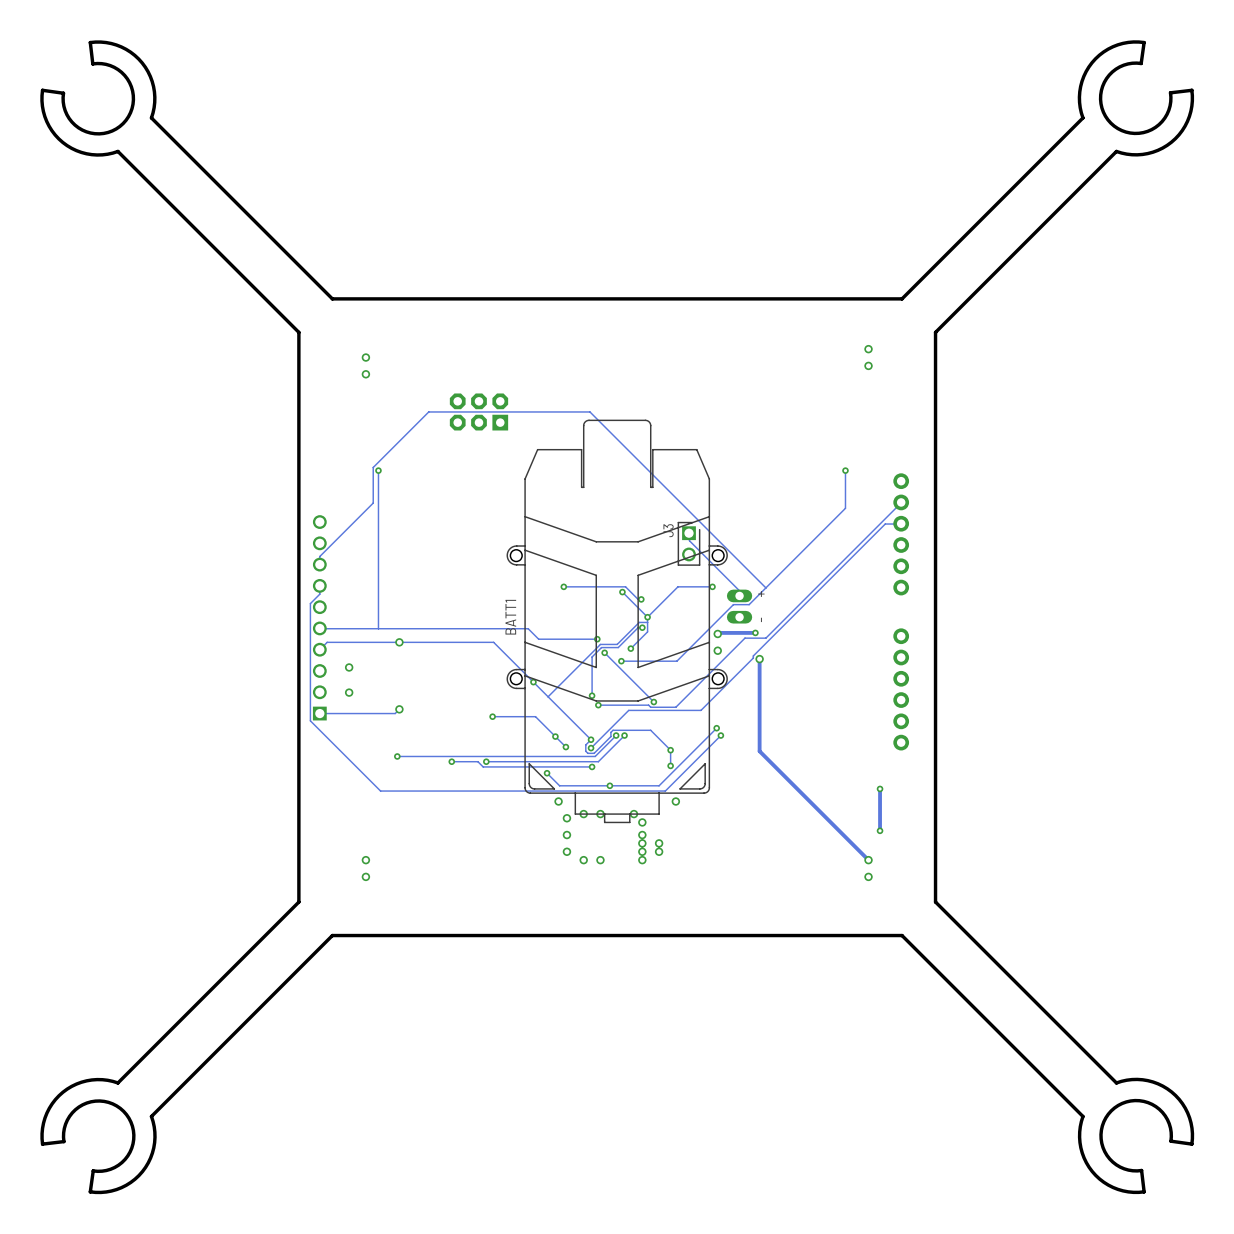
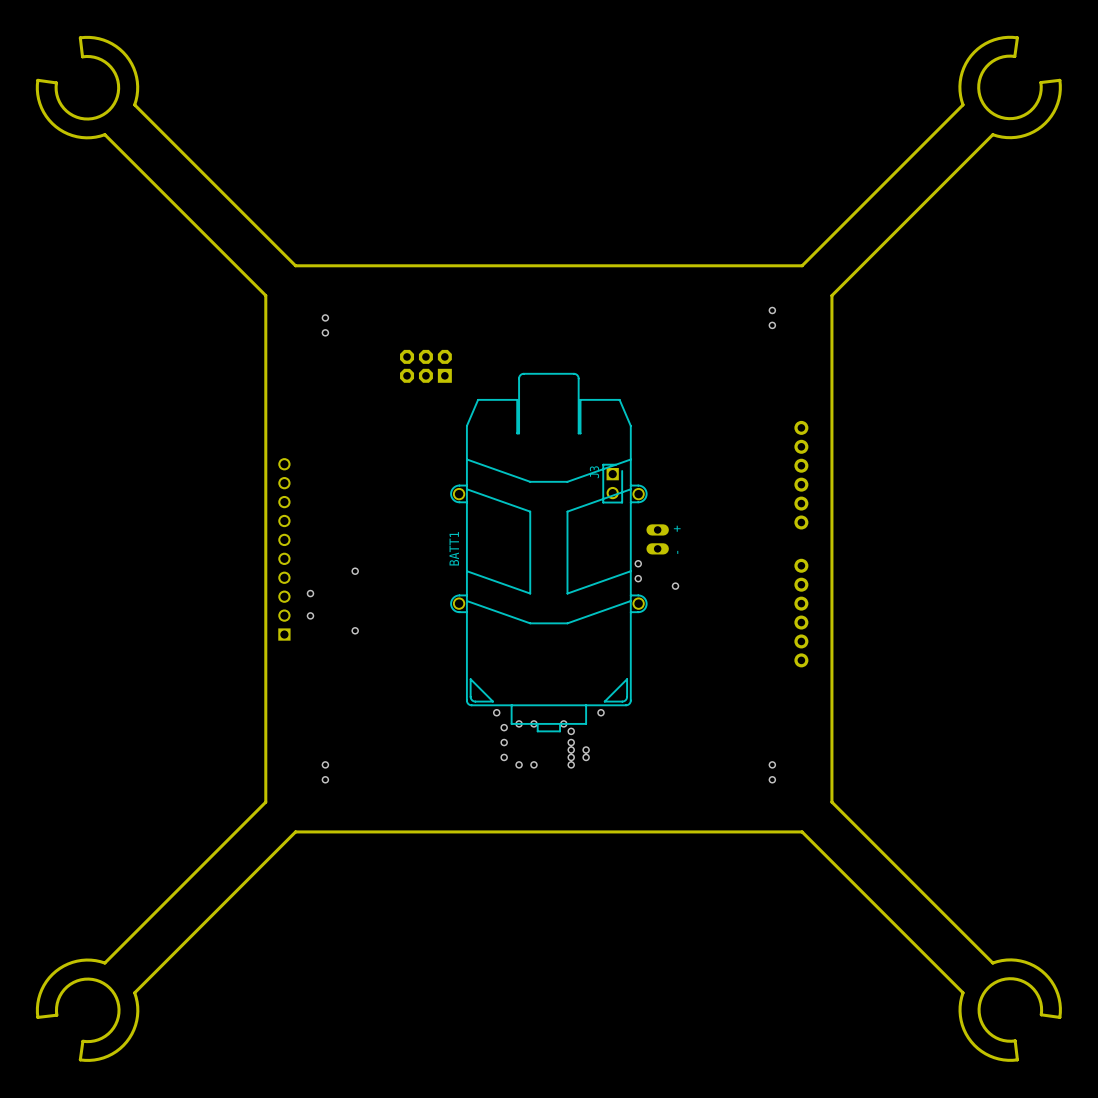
track: (378, 470) (378, 628) -> none
via: (378, 470) -> none
track: (845, 470) (845, 508) (749, 604) (733, 604) (676, 661) (621, 661) -> none
via: (845, 470) -> none
track: (901, 502) (765, 638) (744, 638) (675, 707) (598, 705) -> none
track: (901, 523) (885, 524) (700, 710) (628, 710) (591, 748) -> none
track: (689, 533) (689, 540) (738, 589) (739, 595) -> none
track: (319, 564) (319, 556) (373, 503) (373, 467) (428, 411) (589, 411) (765, 587) -> none
track: (319, 585) (319, 594) (310, 603) (310, 720) (380, 791) (665, 791) (720, 735) -> none
track: (563, 586) (625, 586) (638, 599) (641, 599) -> none
via: (563, 586) -> none
track: (712, 586) (677, 586) (647, 617) -> none
via: (712, 586) -> none
track: (622, 592) (647, 617) -> none
via: (622, 592) -> none
via: (641, 599) -> none
track: (647, 617) (647, 631) (630, 648) -> none
via: (647, 617) -> none
track: (647, 622) (639, 622) (617, 644) (600, 644) (548, 696) -> none
track: (642, 627) (638, 627) (618, 647) (601, 647) (592, 657) (592, 695) -> none
via: (642, 627) -> none
track: (319, 628) (528, 628) (538, 639) (597, 639) -> none
track: (755, 632) (717, 633) -> none
via: (755, 632) -> none
via: (597, 639) -> none
via: (630, 648) -> none
track: (319, 649) (327, 642) (493, 642) (591, 739) (585, 744) (585, 751) (587, 753) (594, 753) (610, 736) (613, 730) (650, 730) (670, 750) (670, 765) -> none
track: (604, 652) (653, 702) -> none
via: (604, 652) -> none
track: (759, 659) (759, 751) (868, 860) -> none
via: (621, 661) -> none
via: (533, 682) -> none
via: (592, 695) -> none
via: (653, 702) -> none
via: (598, 705) -> none
track: (399, 709) (395, 713) (319, 713) -> none
track: (492, 716) (535, 716) (565, 747) -> none
via: (492, 716) -> none
track: (716, 728) (659, 785) (559, 785) (547, 773) -> none
via: (716, 728) -> none
track: (616, 735) (595, 756) (397, 756) -> none
via: (616, 735) -> none
track: (624, 735) (598, 761) (486, 761) -> none
via: (624, 735) -> none
via: (720, 735) -> none
via: (555, 736) -> none
via: (591, 739) -> none
via: (565, 747) -> none
via: (591, 748) -> none
via: (670, 750) -> none
via: (397, 756) -> none
track: (451, 761) (477, 761) (483, 766) (592, 766) -> none
via: (451, 761) -> none
via: (486, 761) -> none
via: (670, 765) -> none
via: (592, 766) -> none
via: (547, 773) -> none
via: (609, 785) -> none
track: (880, 788) (880, 830) -> none
via: (880, 788) -> none
via: (880, 830) -> none

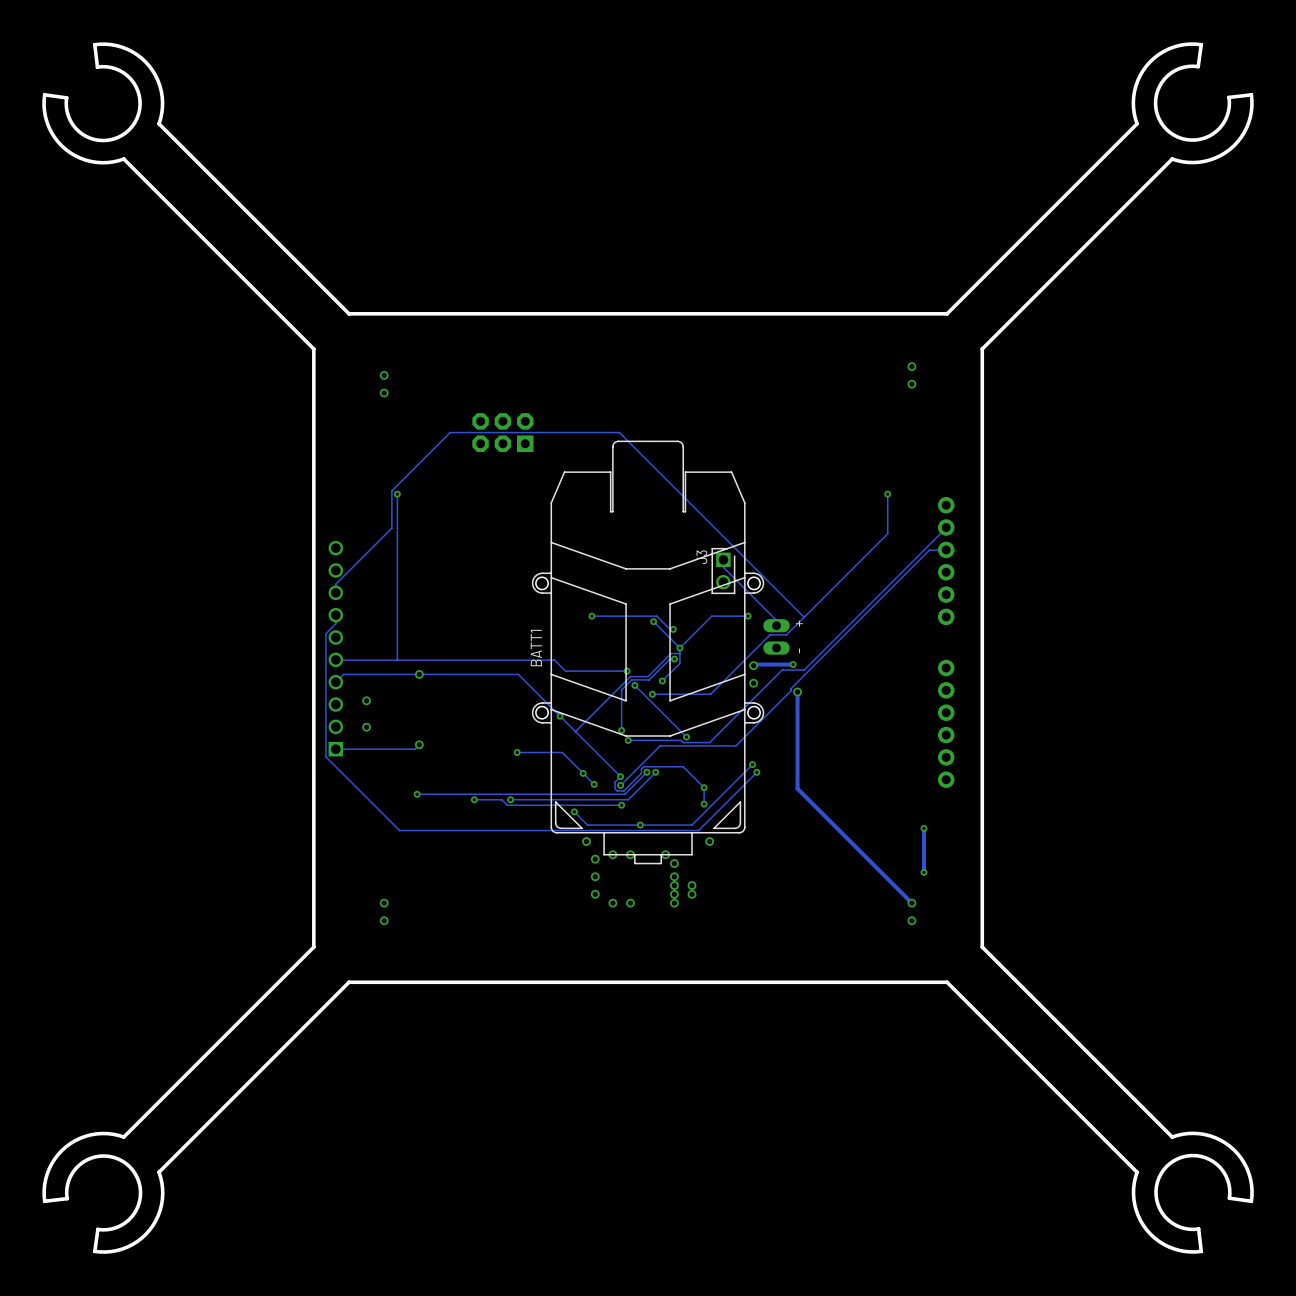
track: none -> (397, 494) (397, 660)
via: none -> (397, 494)
track: none -> (887, 494) (887, 533) (786, 634) (770, 634) (710, 694) (652, 694)
via: none -> (887, 494)
track: none -> (946, 527) (804, 670) (782, 670) (709, 742) (628, 740)
track: none -> (946, 549) (929, 550) (736, 745) (660, 745) (620, 785)
track: none -> (723, 559) (723, 567) (775, 619) (776, 625)
track: none -> (335, 592) (335, 584) (391, 528) (391, 490) (450, 432) (619, 432) (804, 617)
track: none -> (335, 615) (335, 623) (325, 633) (325, 756) (399, 830) (698, 830) (756, 772)
track: none -> (591, 616) (656, 616) (670, 629) (673, 629)
via: none -> (591, 616)
track: none -> (748, 616) (711, 616) (679, 648)
via: none -> (748, 616)
track: none -> (653, 621) (679, 648)
via: none -> (653, 621)
via: none -> (673, 629)
track: none -> (679, 648) (679, 663) (662, 681)
via: none -> (679, 648)
track: none -> (679, 653) (671, 653) (648, 676) (630, 676) (575, 731)
track: none -> (335, 659) (554, 660) (565, 671) (627, 671)
track: none -> (674, 659) (670, 659) (649, 679) (631, 679) (621, 689) (621, 730)
via: none -> (674, 659)
track: none -> (793, 664) (753, 665)
via: none -> (793, 664)
via: none -> (627, 671)
via: none -> (662, 681)
track: none -> (335, 682) (343, 674) (518, 674) (620, 776) (615, 782) (615, 788) (617, 790) (623, 790) (641, 773) (643, 766) (683, 766) (704, 787) (704, 804)
track: none -> (634, 685) (686, 737)
via: none -> (634, 685)
track: none -> (797, 692) (797, 788) (911, 903)
via: none -> (652, 694)
via: none -> (560, 716)
via: none -> (621, 730)
via: none -> (686, 737)
via: none -> (628, 740)
track: none -> (419, 744) (414, 749) (335, 749)
track: none -> (517, 752) (562, 752) (594, 784)
via: none -> (517, 752)
track: none -> (752, 764) (692, 825) (587, 825) (574, 811)
via: none -> (752, 764)
track: none -> (646, 772) (624, 794) (417, 794)
via: none -> (646, 772)
track: none -> (655, 772) (628, 799) (510, 799)
via: none -> (655, 772)
via: none -> (756, 772)
via: none -> (583, 773)
via: none -> (620, 776)
via: none -> (594, 784)
via: none -> (620, 785)
via: none -> (704, 787)
via: none -> (417, 794)
track: none -> (474, 799) (501, 799) (507, 805) (621, 805)
via: none -> (474, 799)
via: none -> (510, 799)
via: none -> (704, 804)
via: none -> (621, 805)
via: none -> (574, 811)
via: none -> (640, 825)
track: none -> (924, 828) (924, 872)
via: none -> (924, 828)
via: none -> (924, 872)

